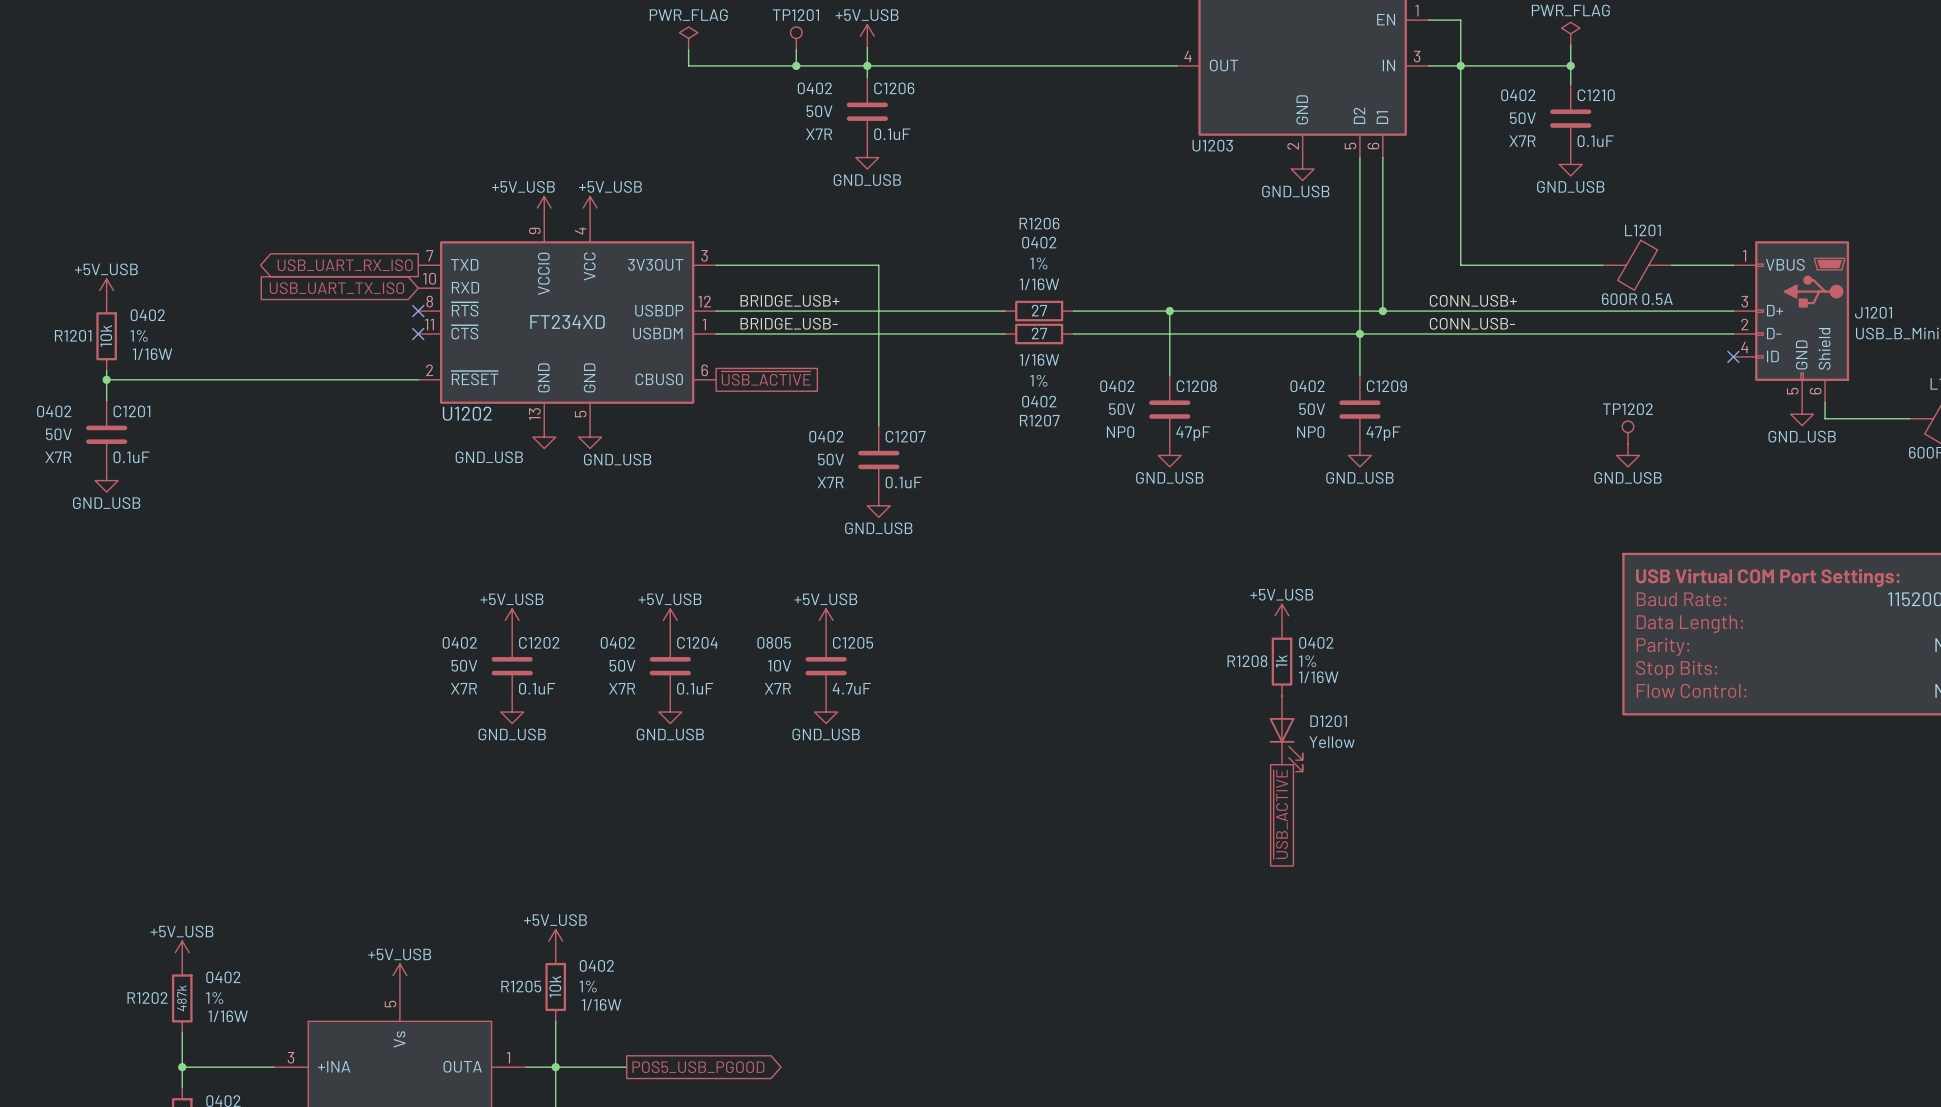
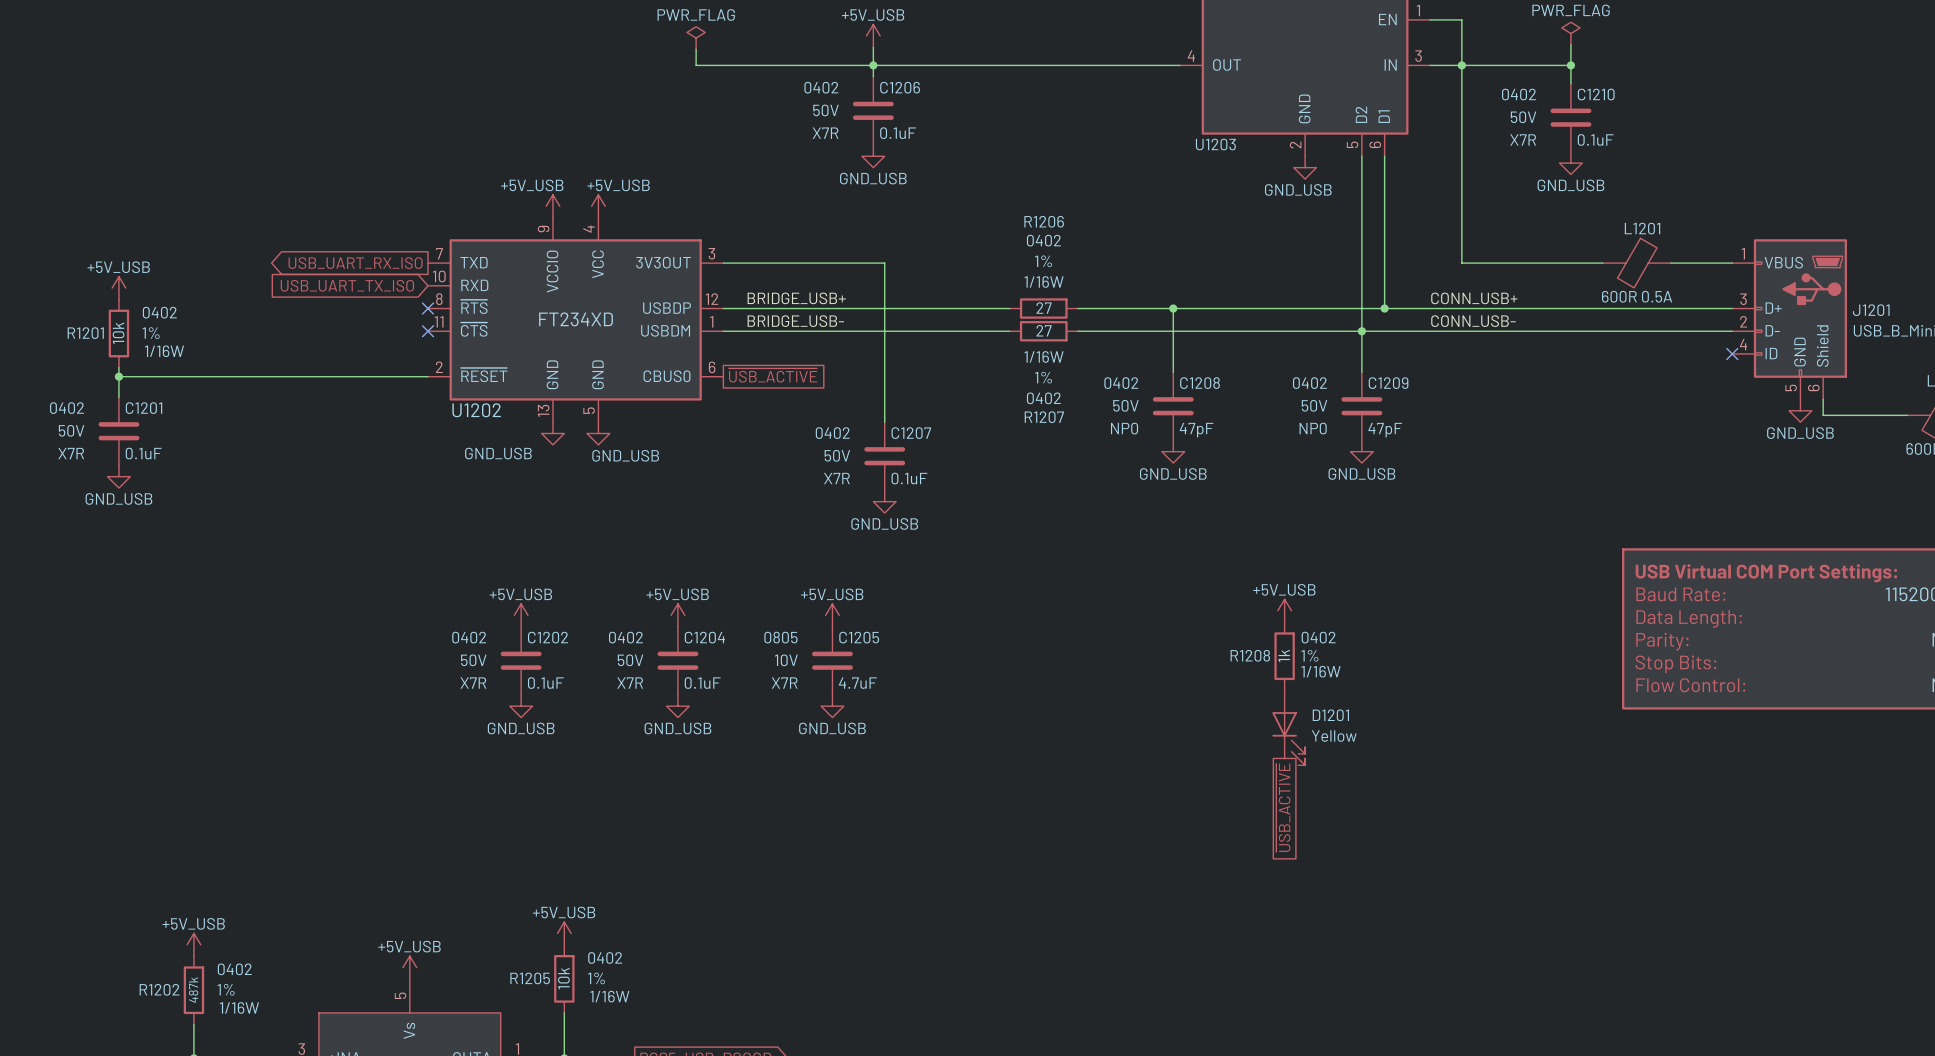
TP1201: (796, 38) -> none
wire: (796, 49) (796, 65) -> none
junction: (796, 65) -> none
TP1202: (1627, 432) -> none
power symbol: GND_USB (1627, 455) -> none

